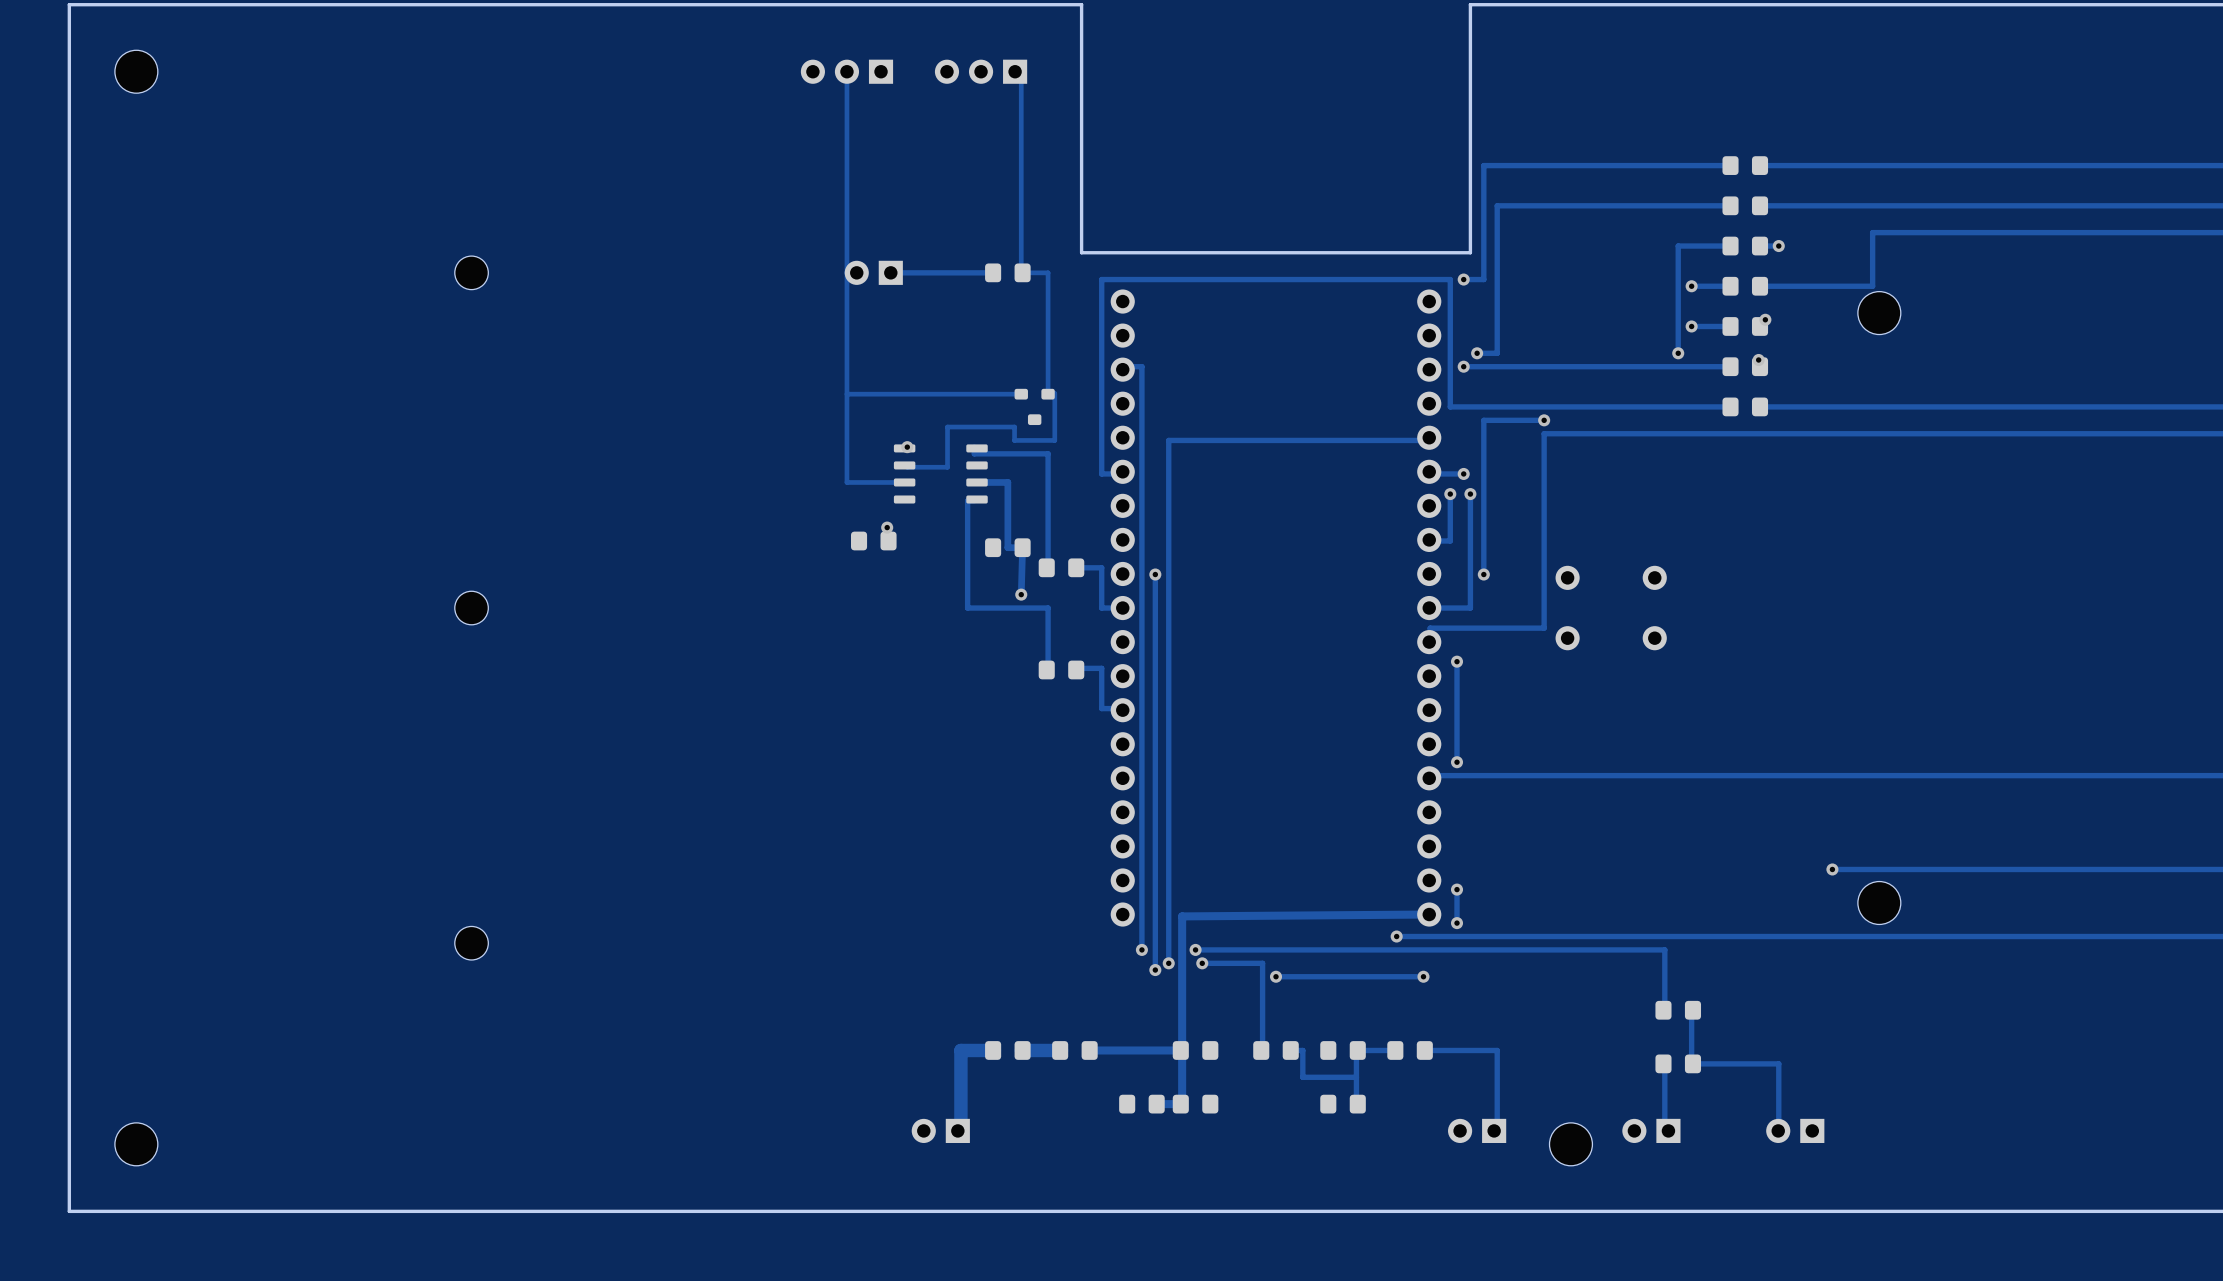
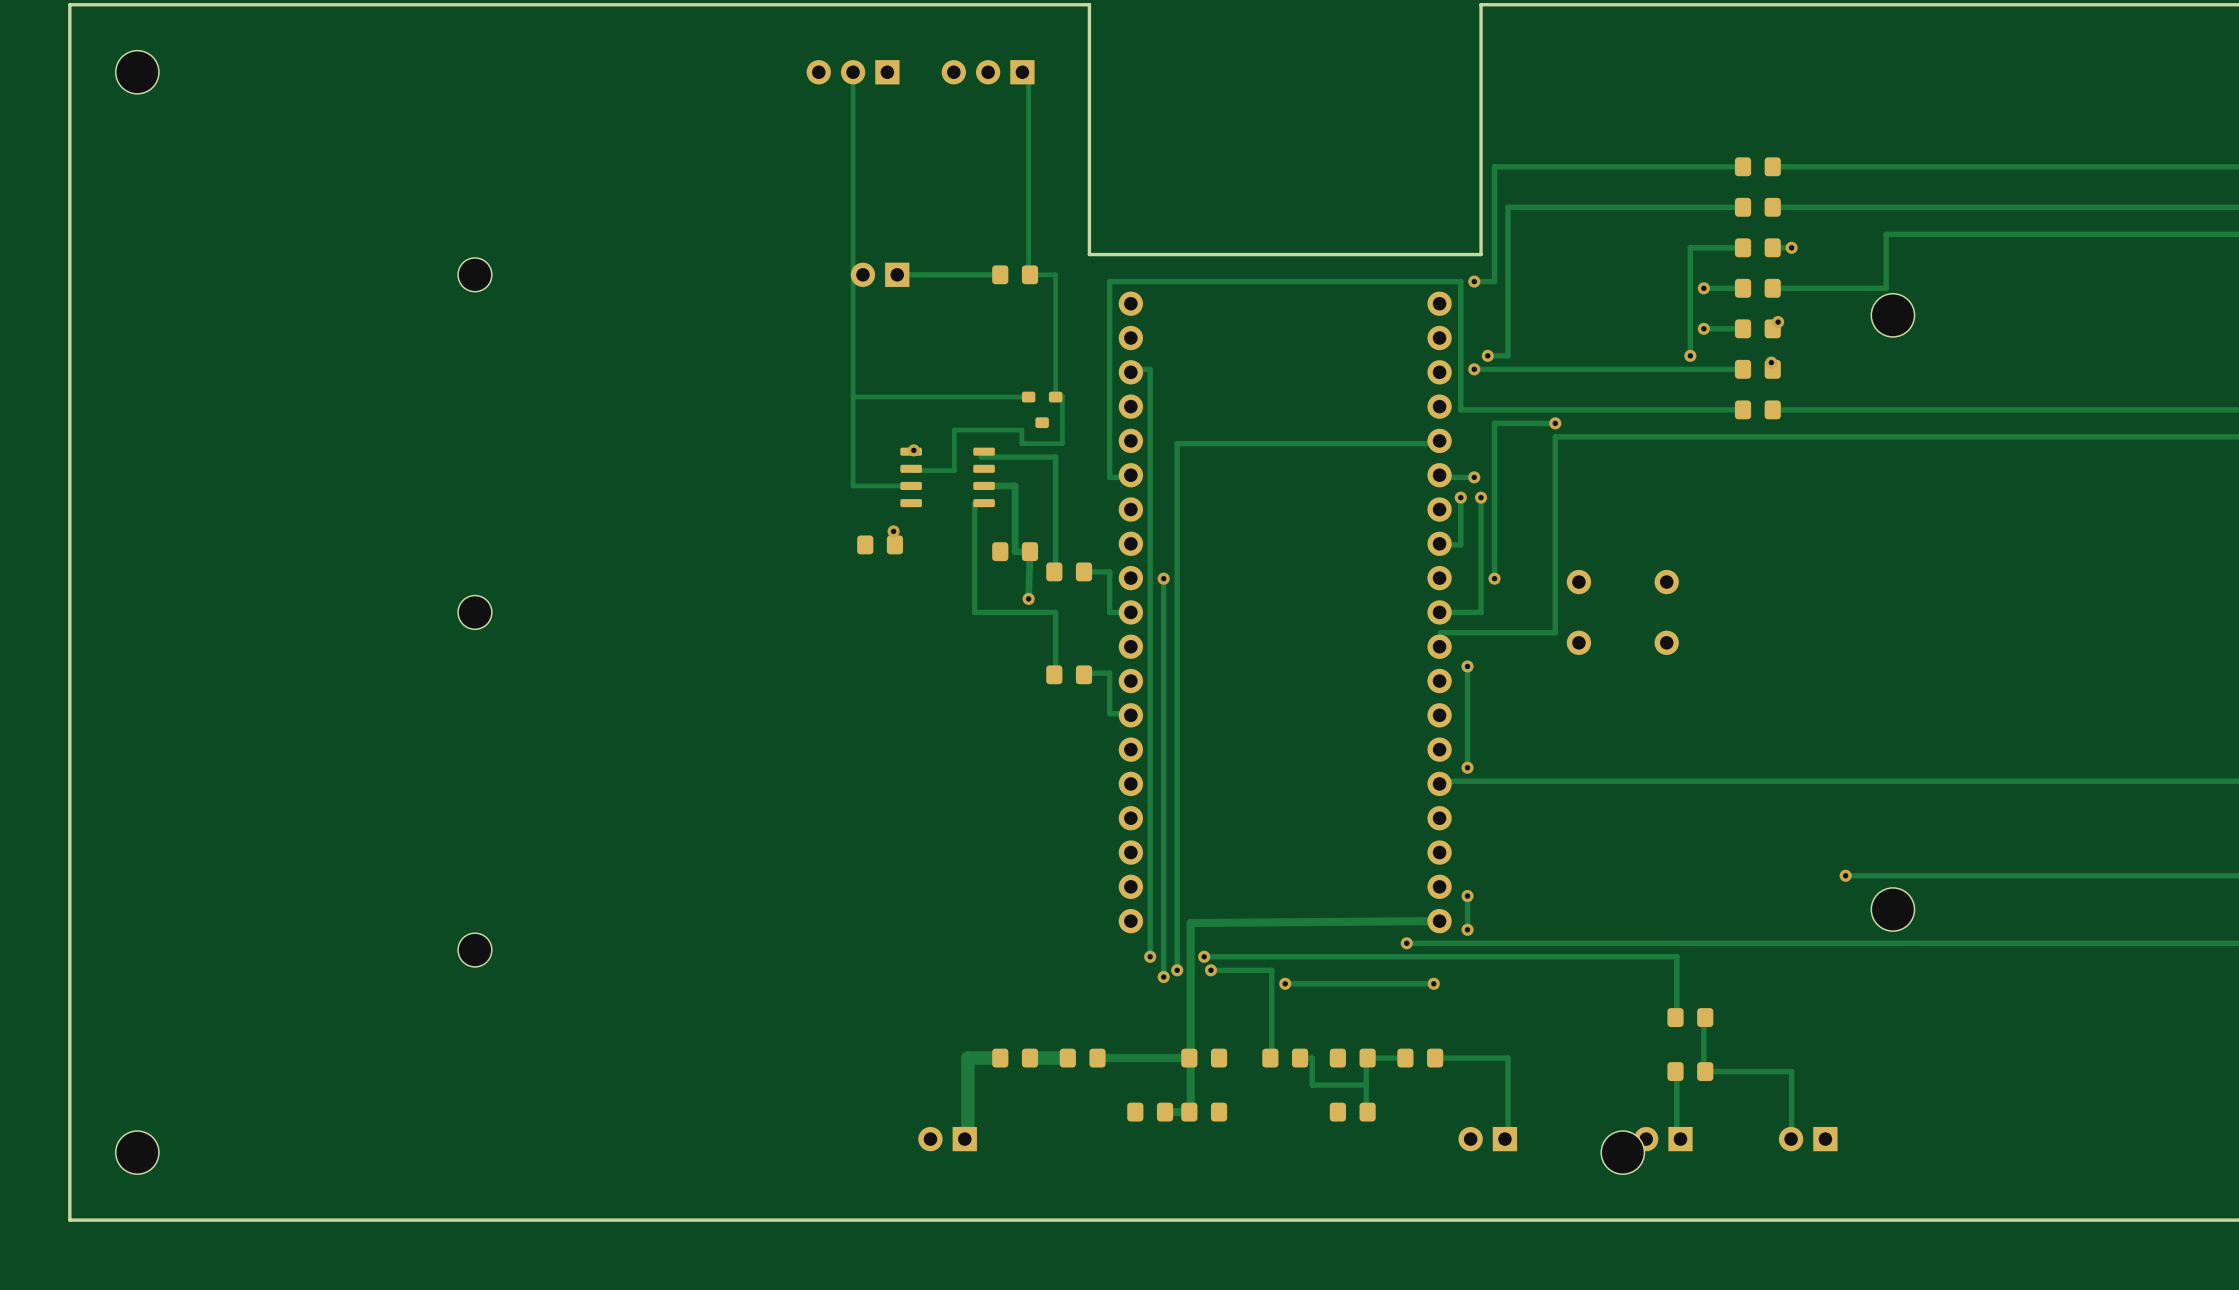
part position: (1570, 1144) -> (1622, 1152)

